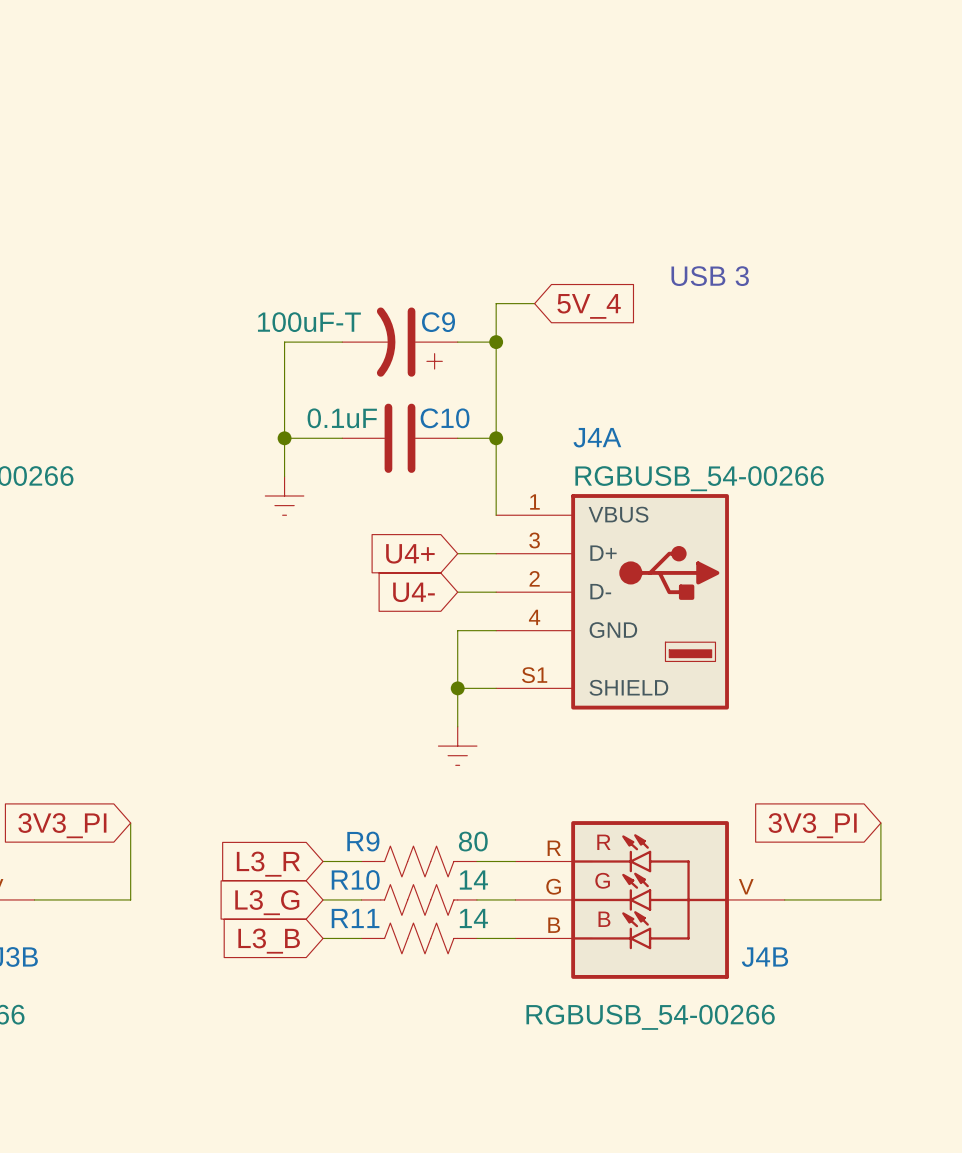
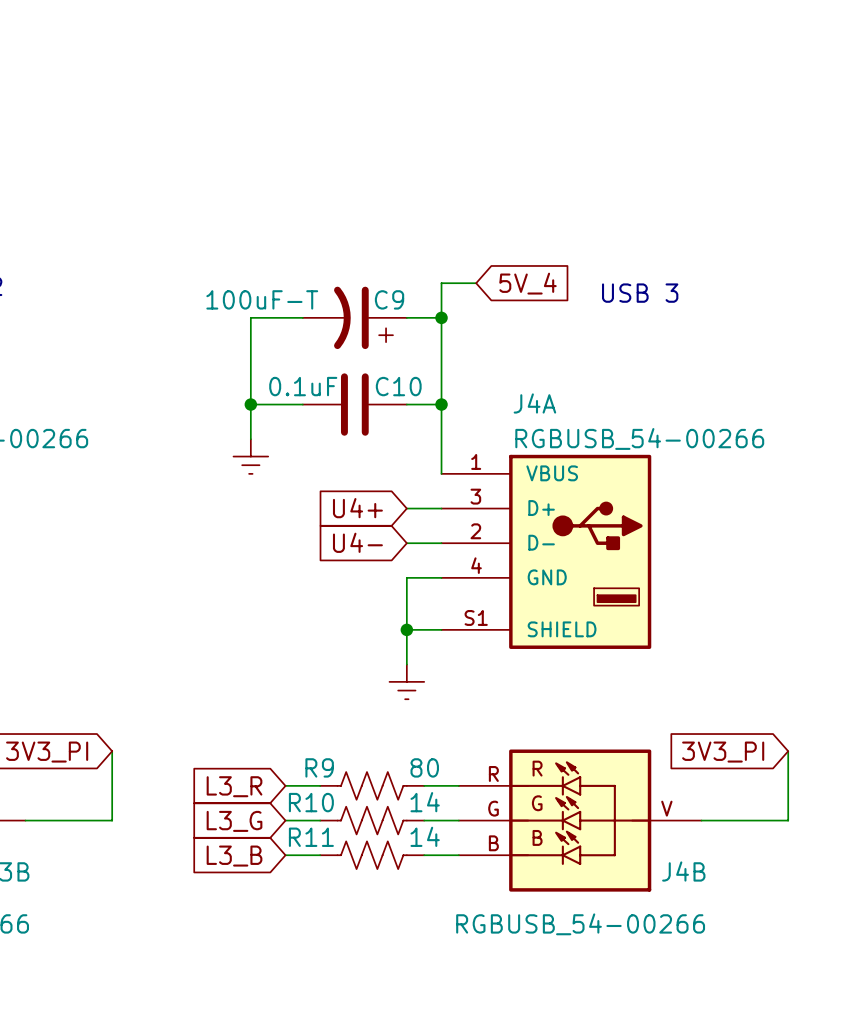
text position: USB 3 (710, 276) -> USB 3 (640, 293)

